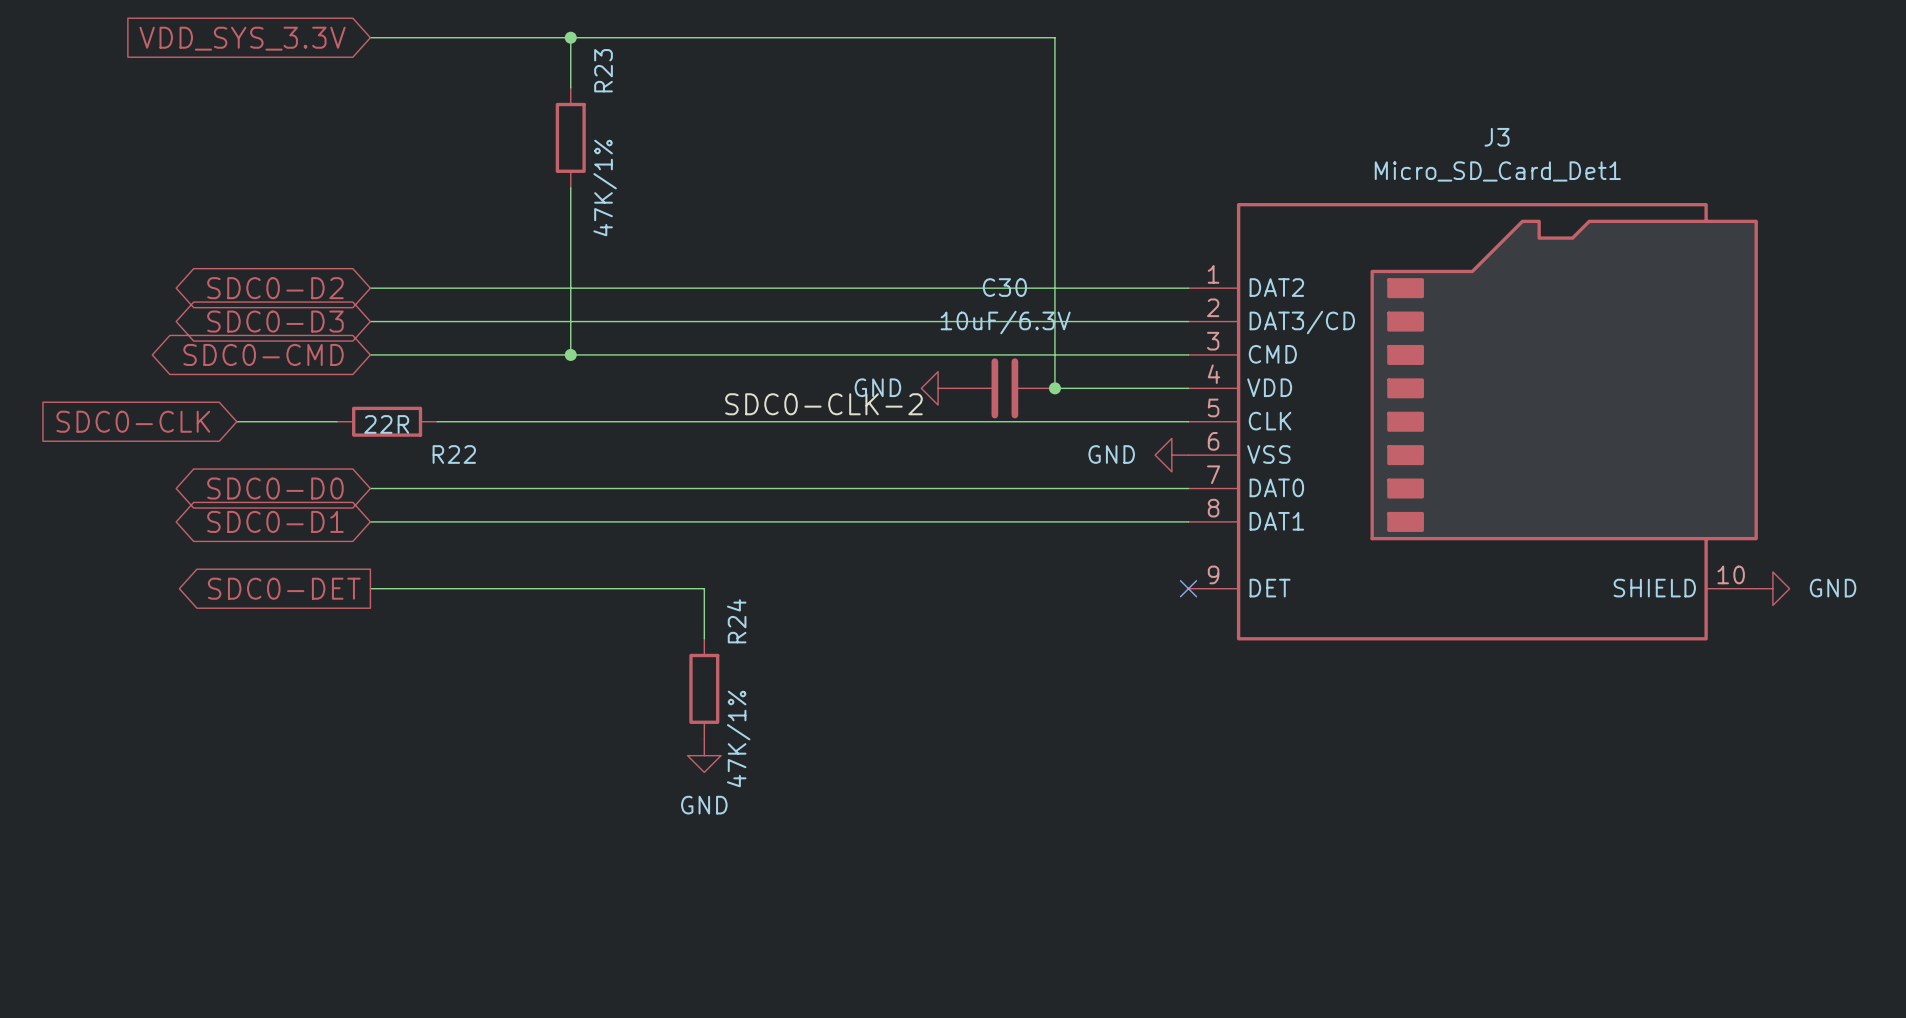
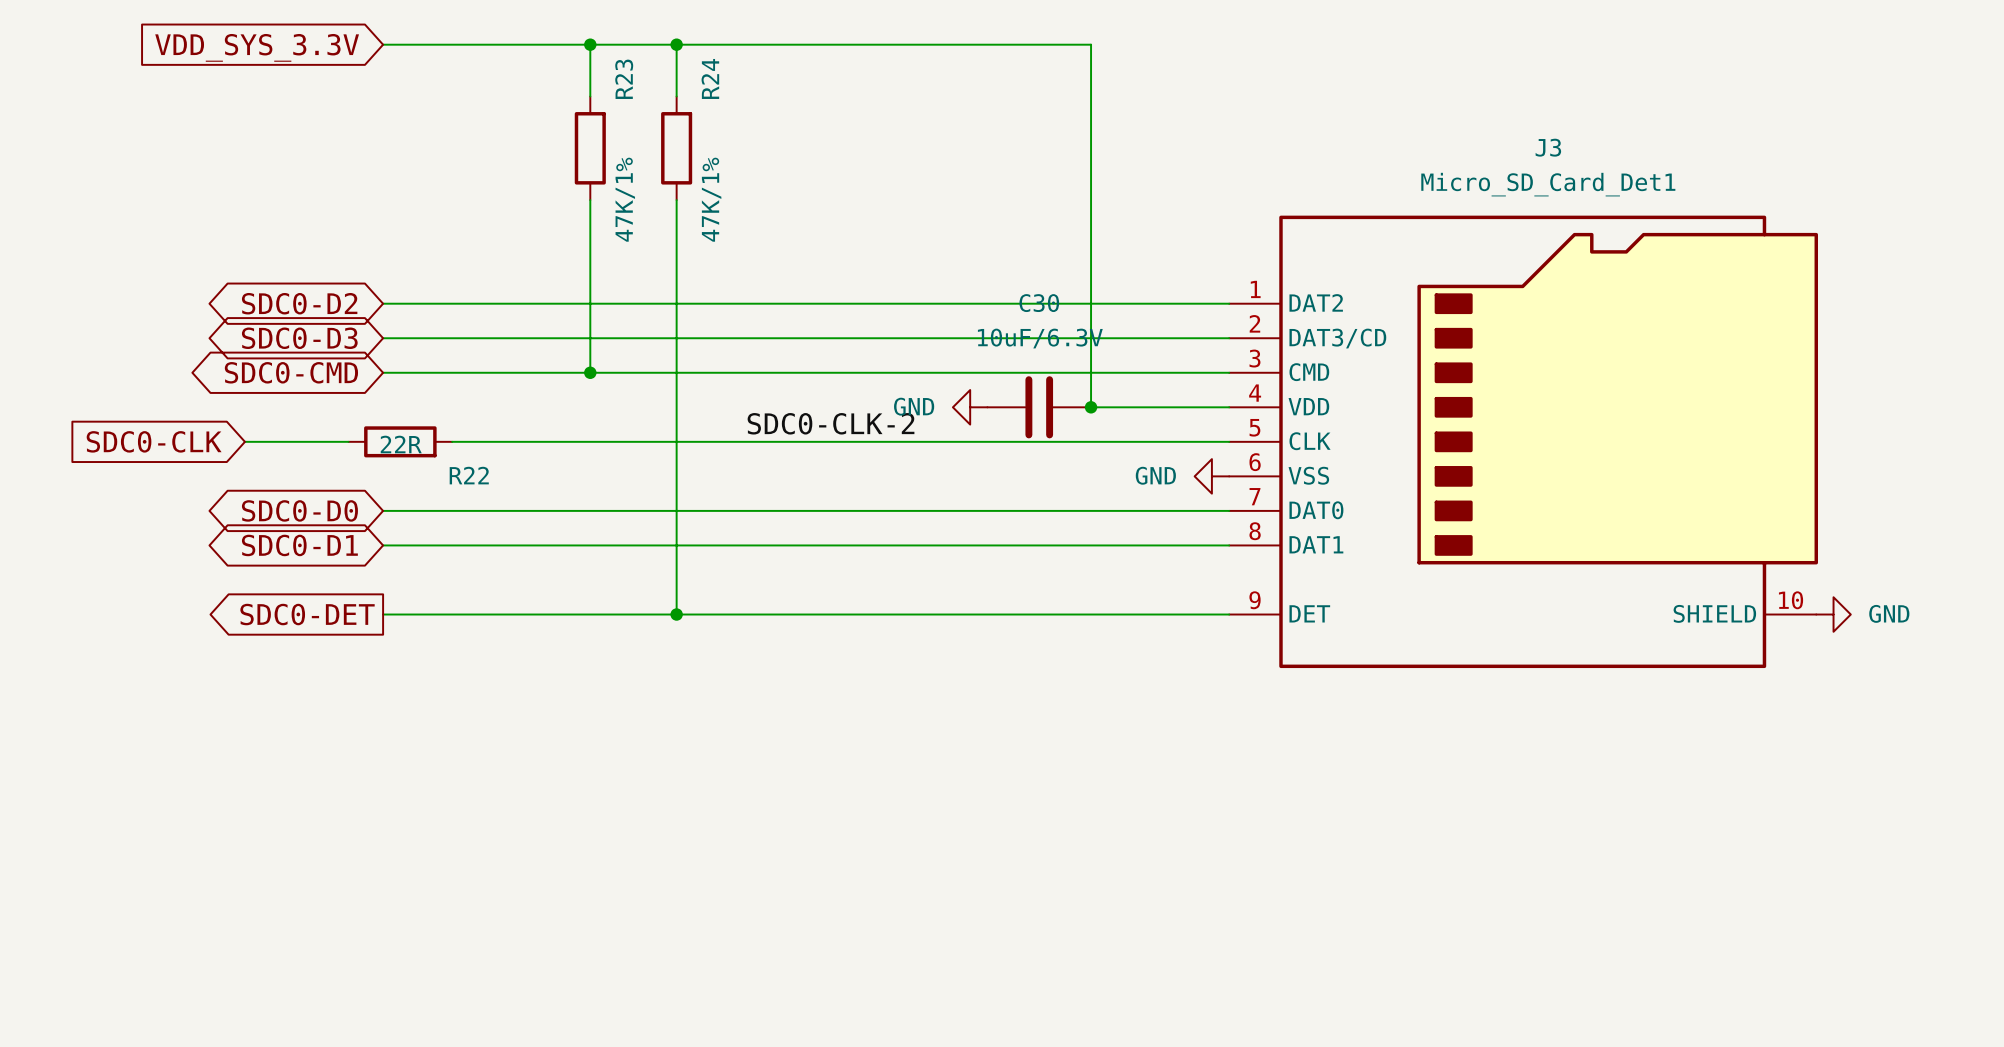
wire: none -> (676, 44) (676, 96)
junction: none -> (676, 44)
wire: none -> (676, 200) (676, 614)
junction: none -> (676, 614)
wire: (704, 588) (704, 638) -> (728, 614) (1229, 614)
no-connect mark: (1188, 588) -> none
R24 position: (704, 688) -> (676, 148)
power symbol: GND (704, 755) -> none

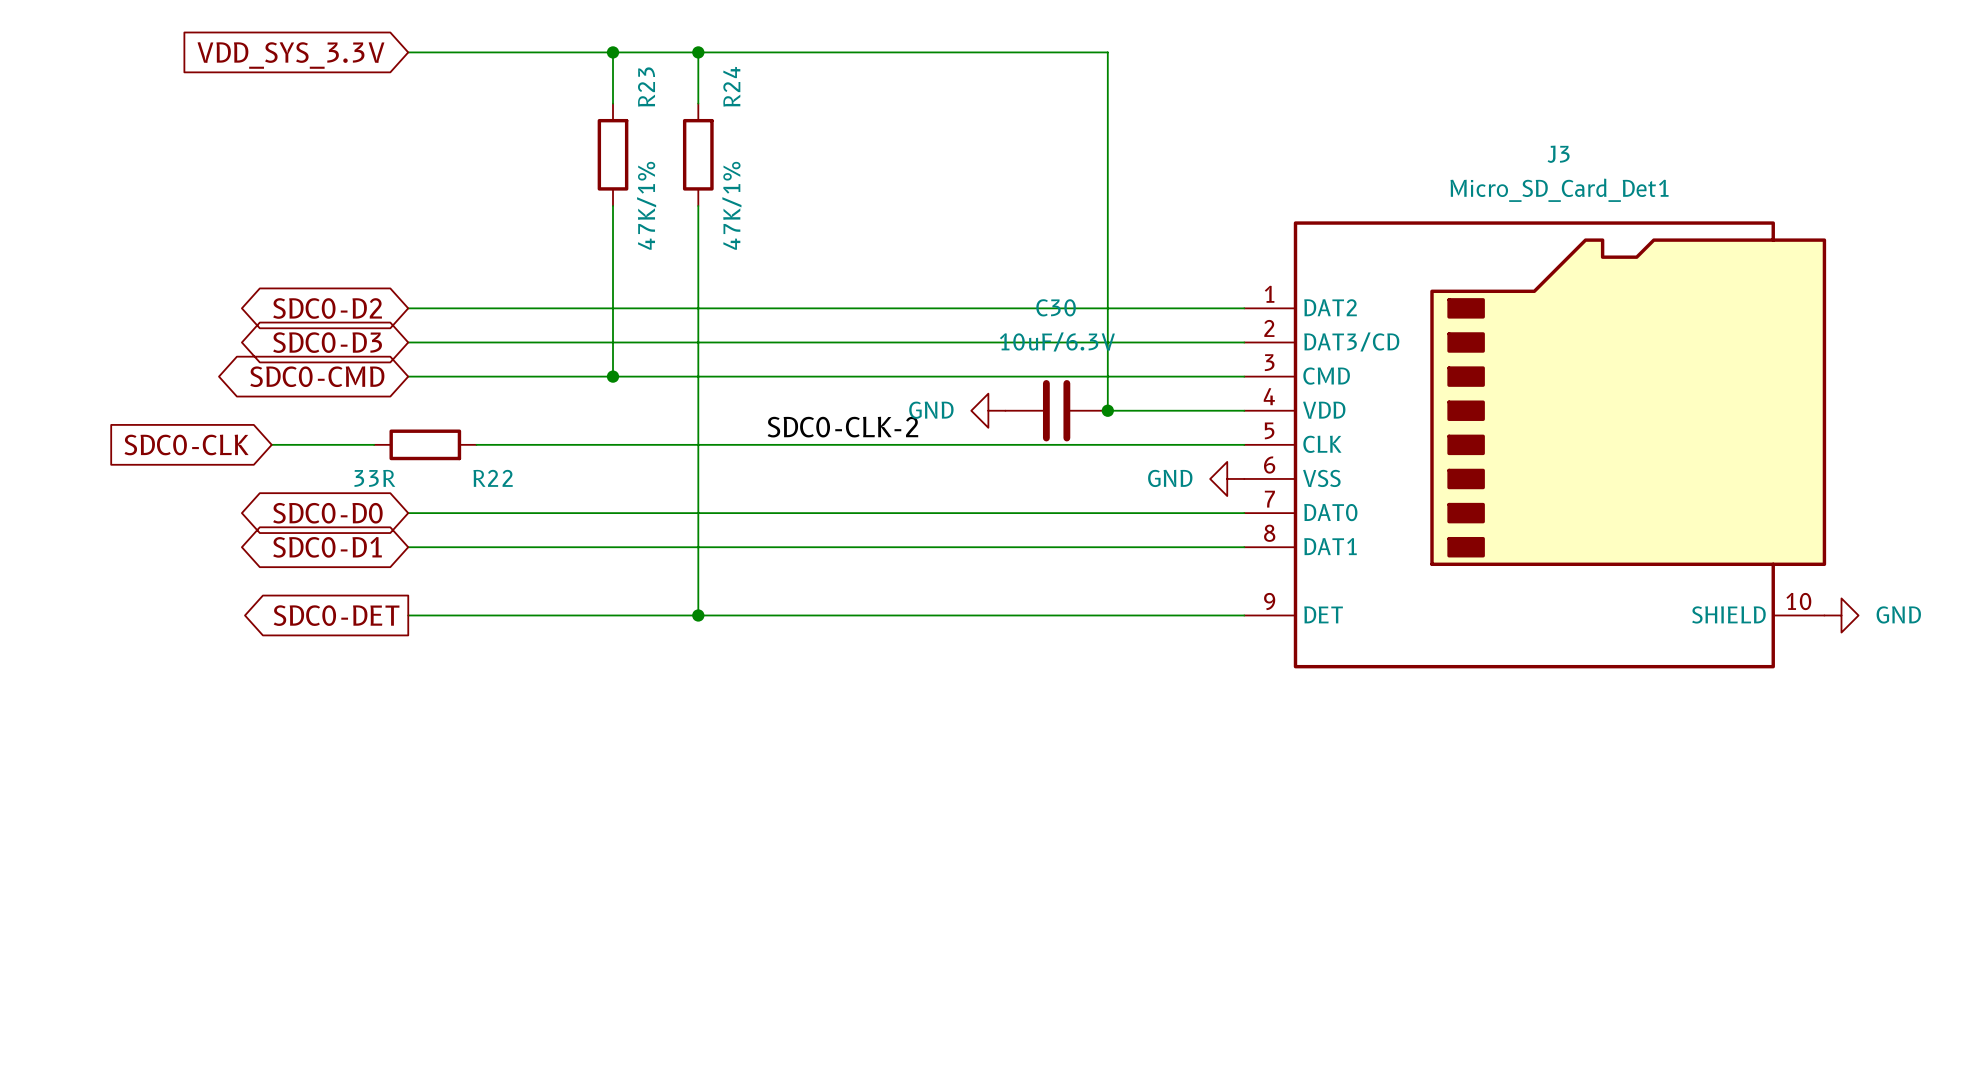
R22 value: 22R (401, 444) -> 33R (374, 478)

